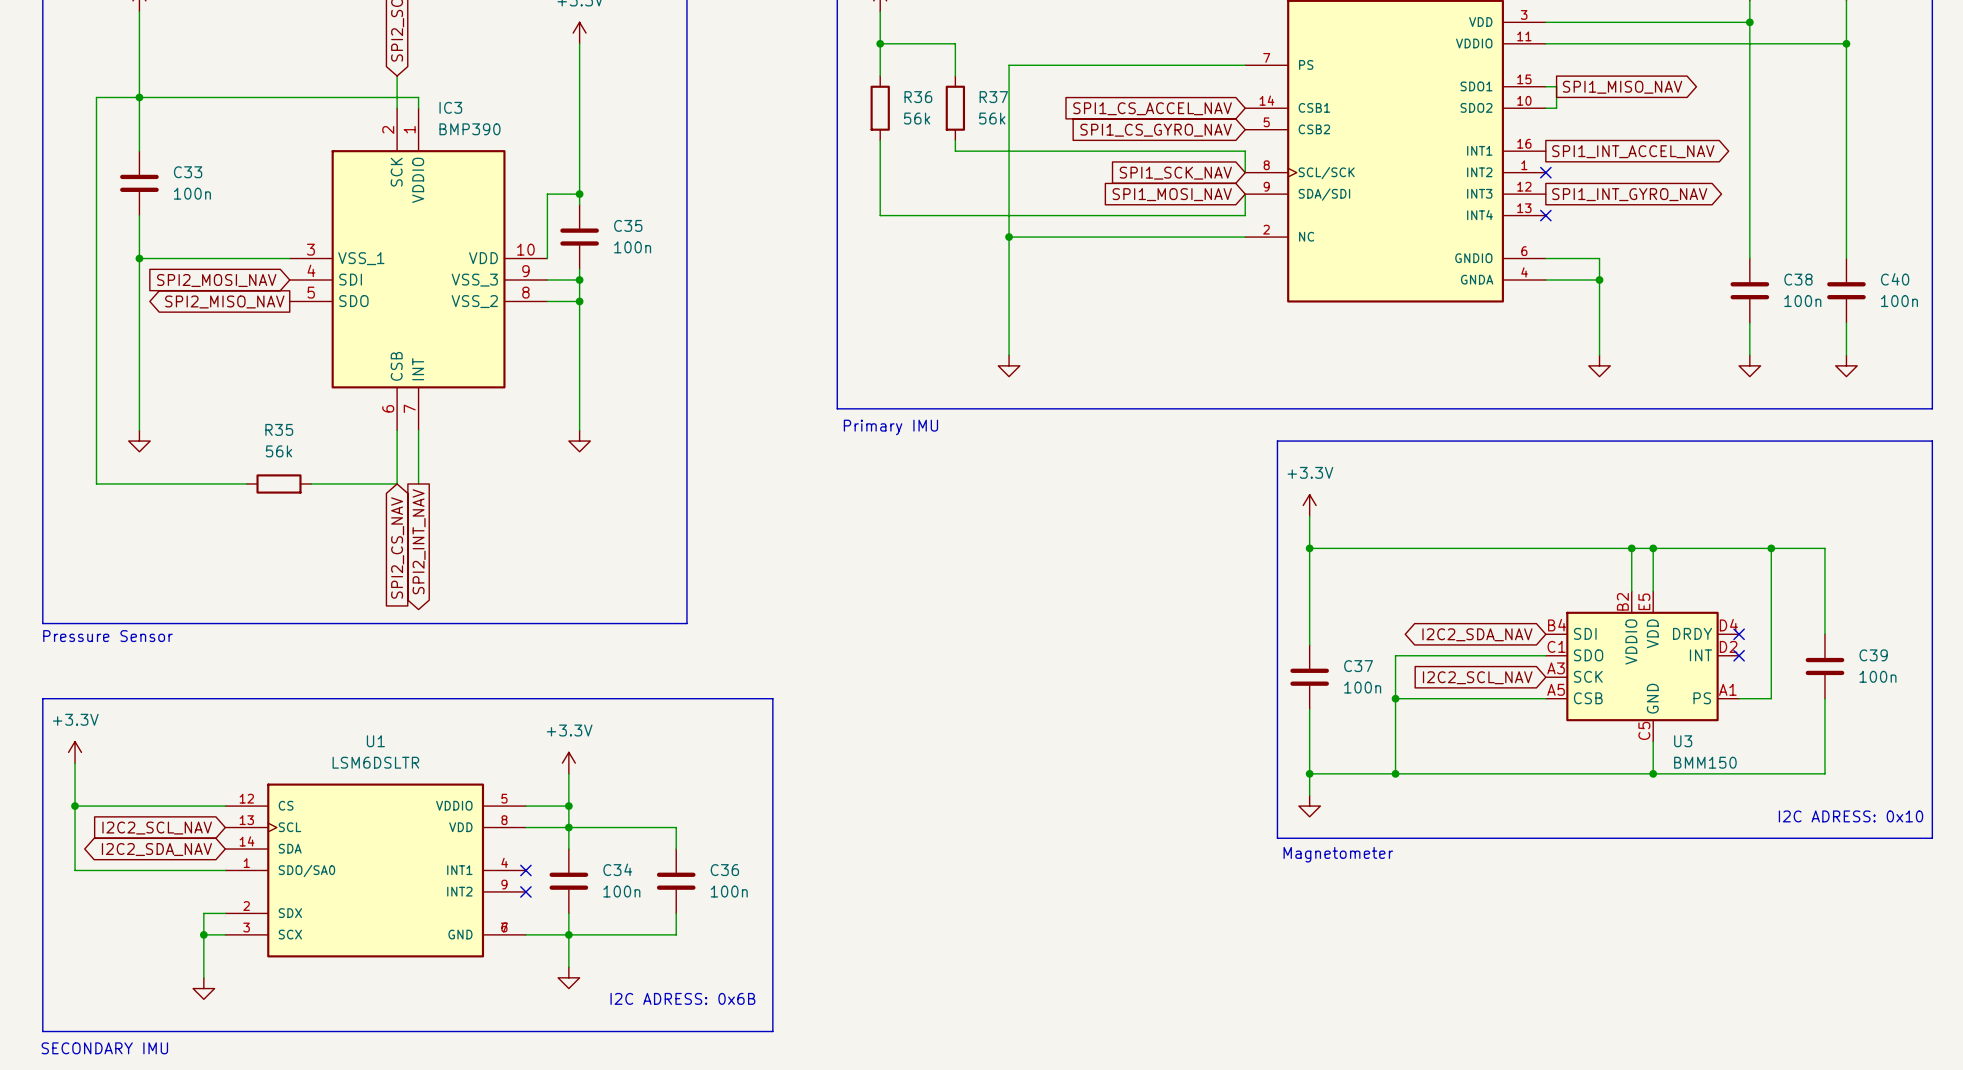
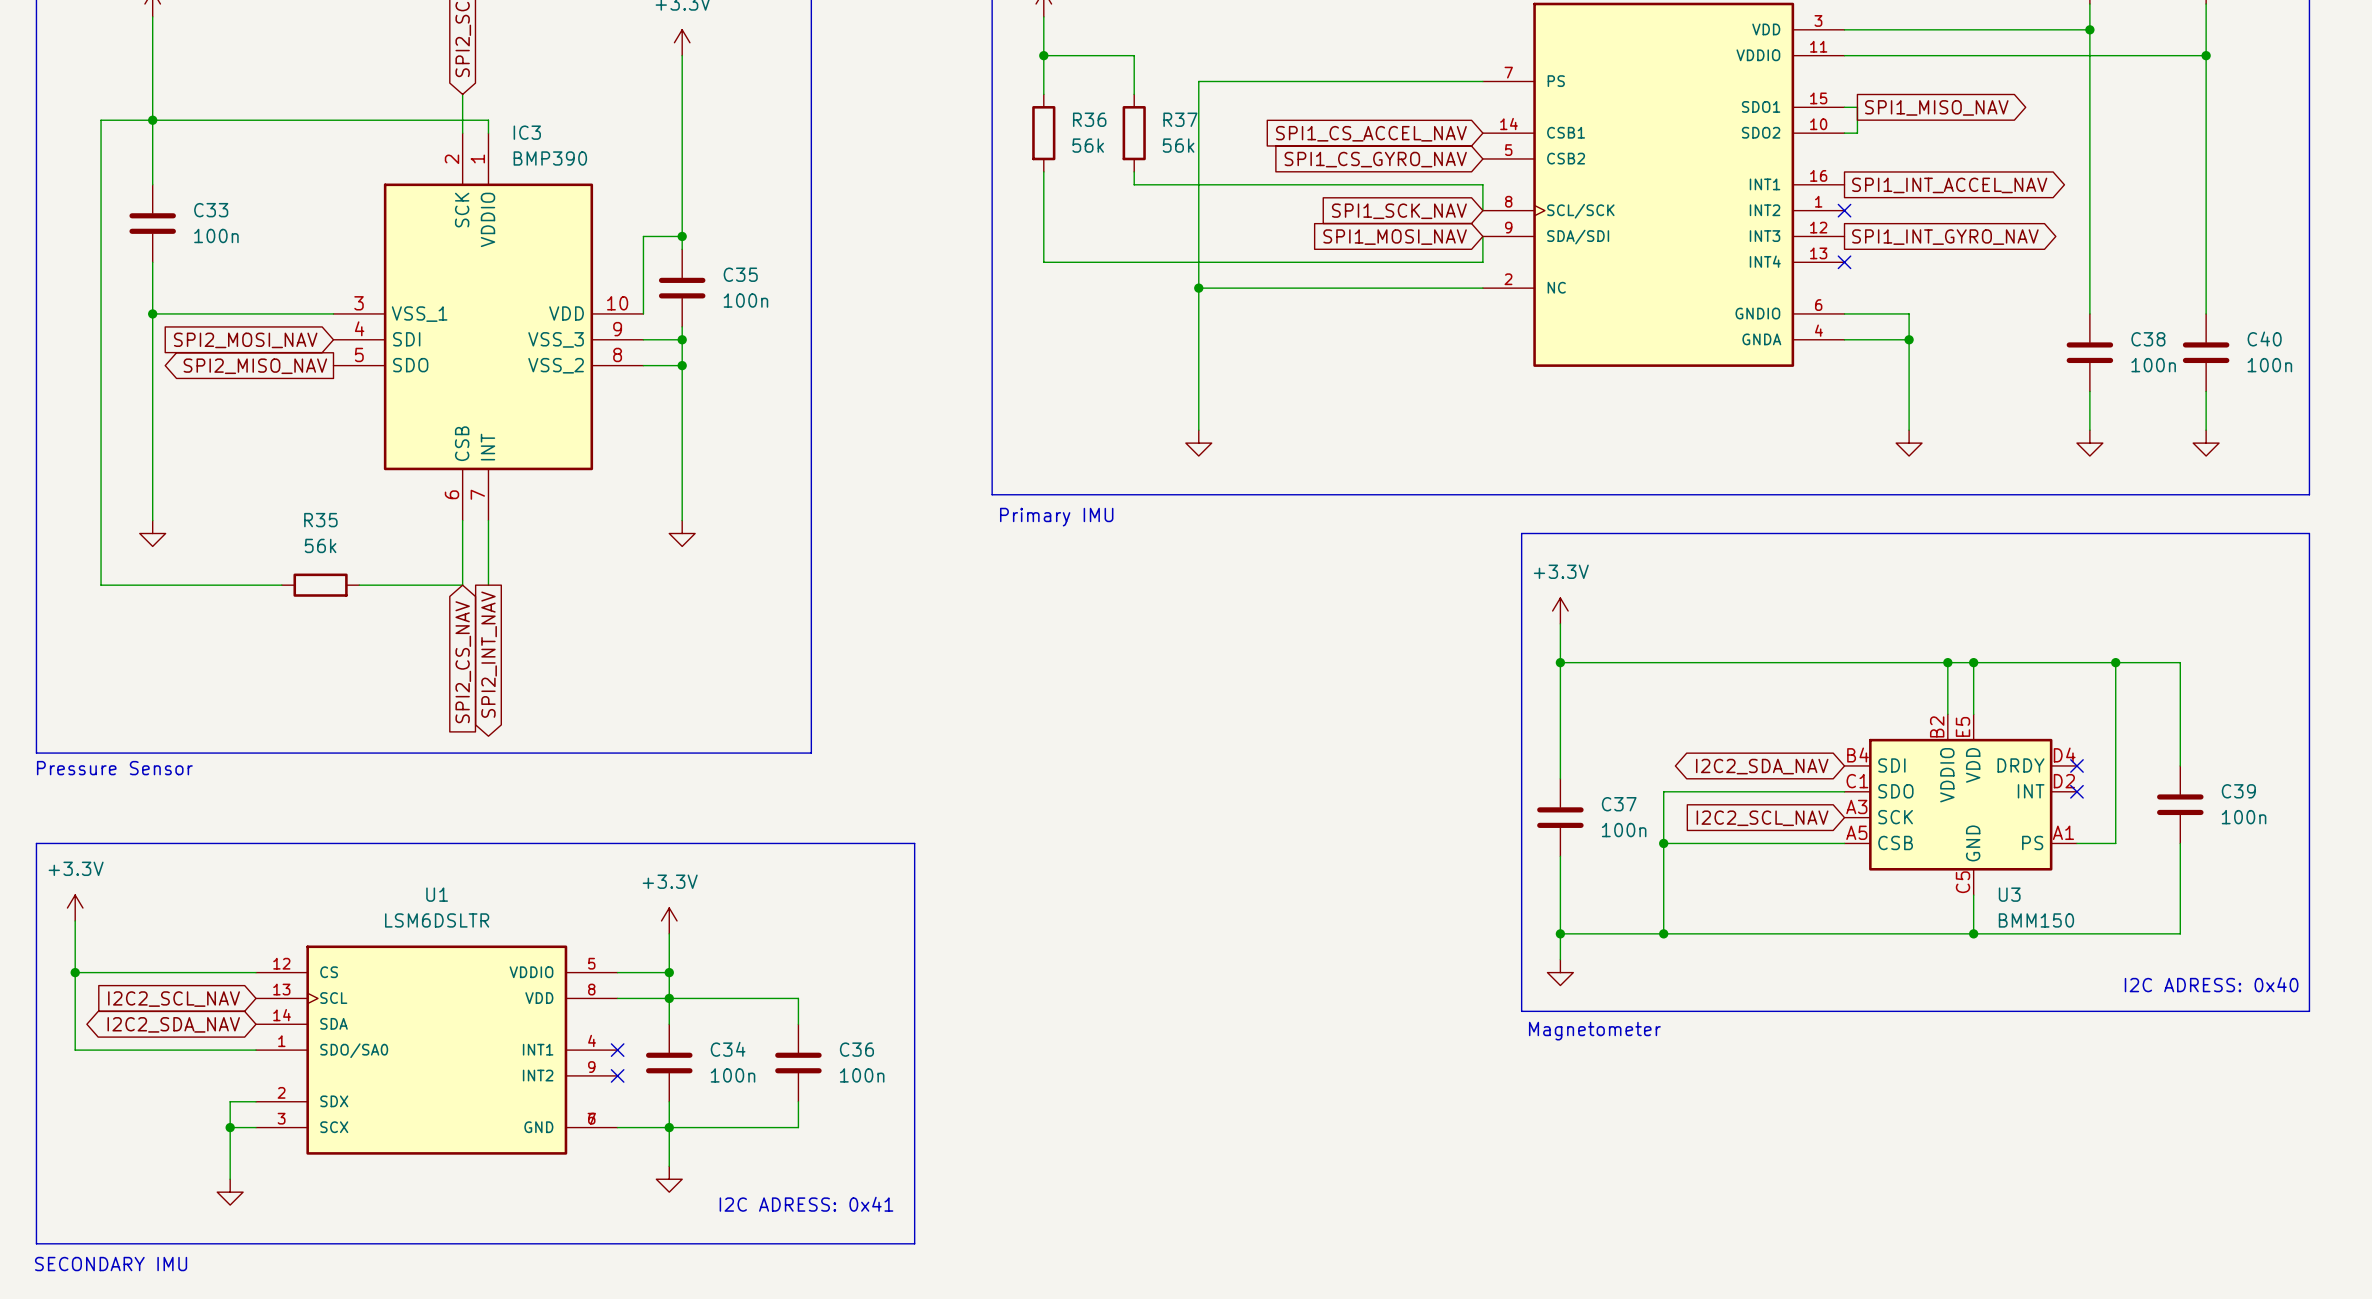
text: I2C ADRESS: 0x10 (1851, 816) -> I2C ADRESS: 0x40 (2211, 984)
text: I2C ADRESS: 0x6B (682, 998) -> I2C ADRESS: 0x41 (806, 1204)

